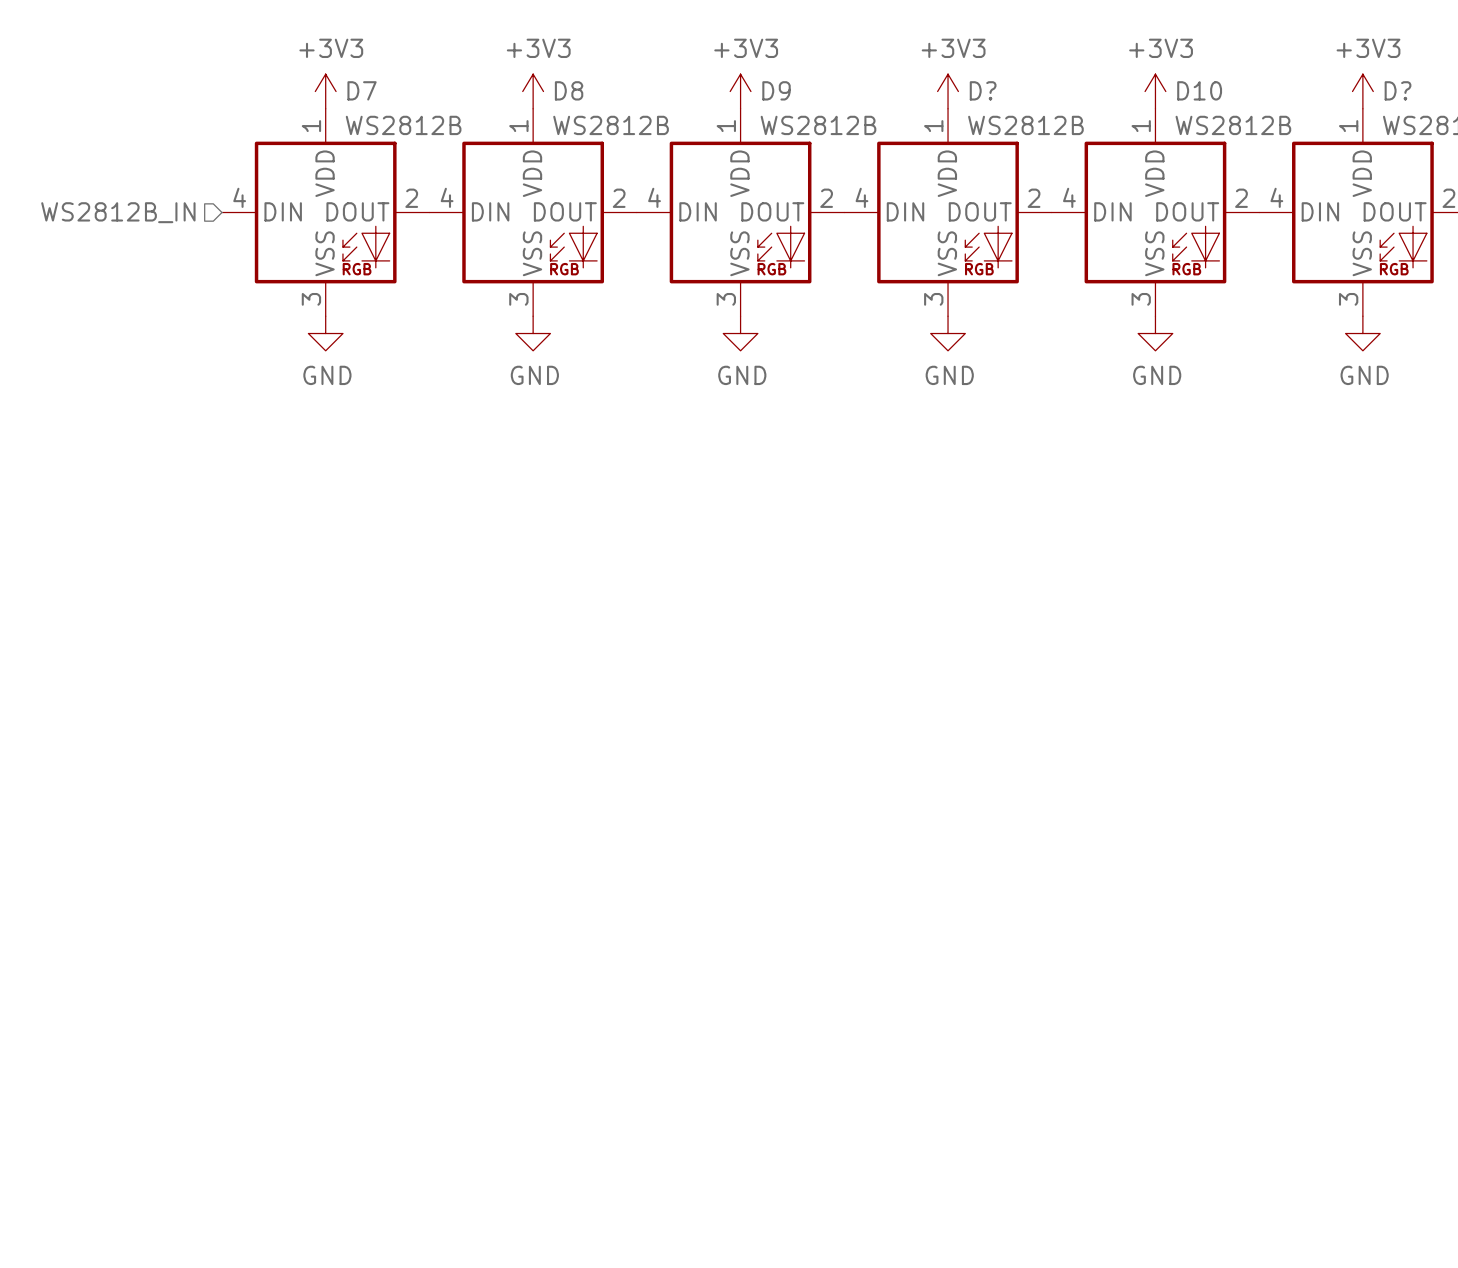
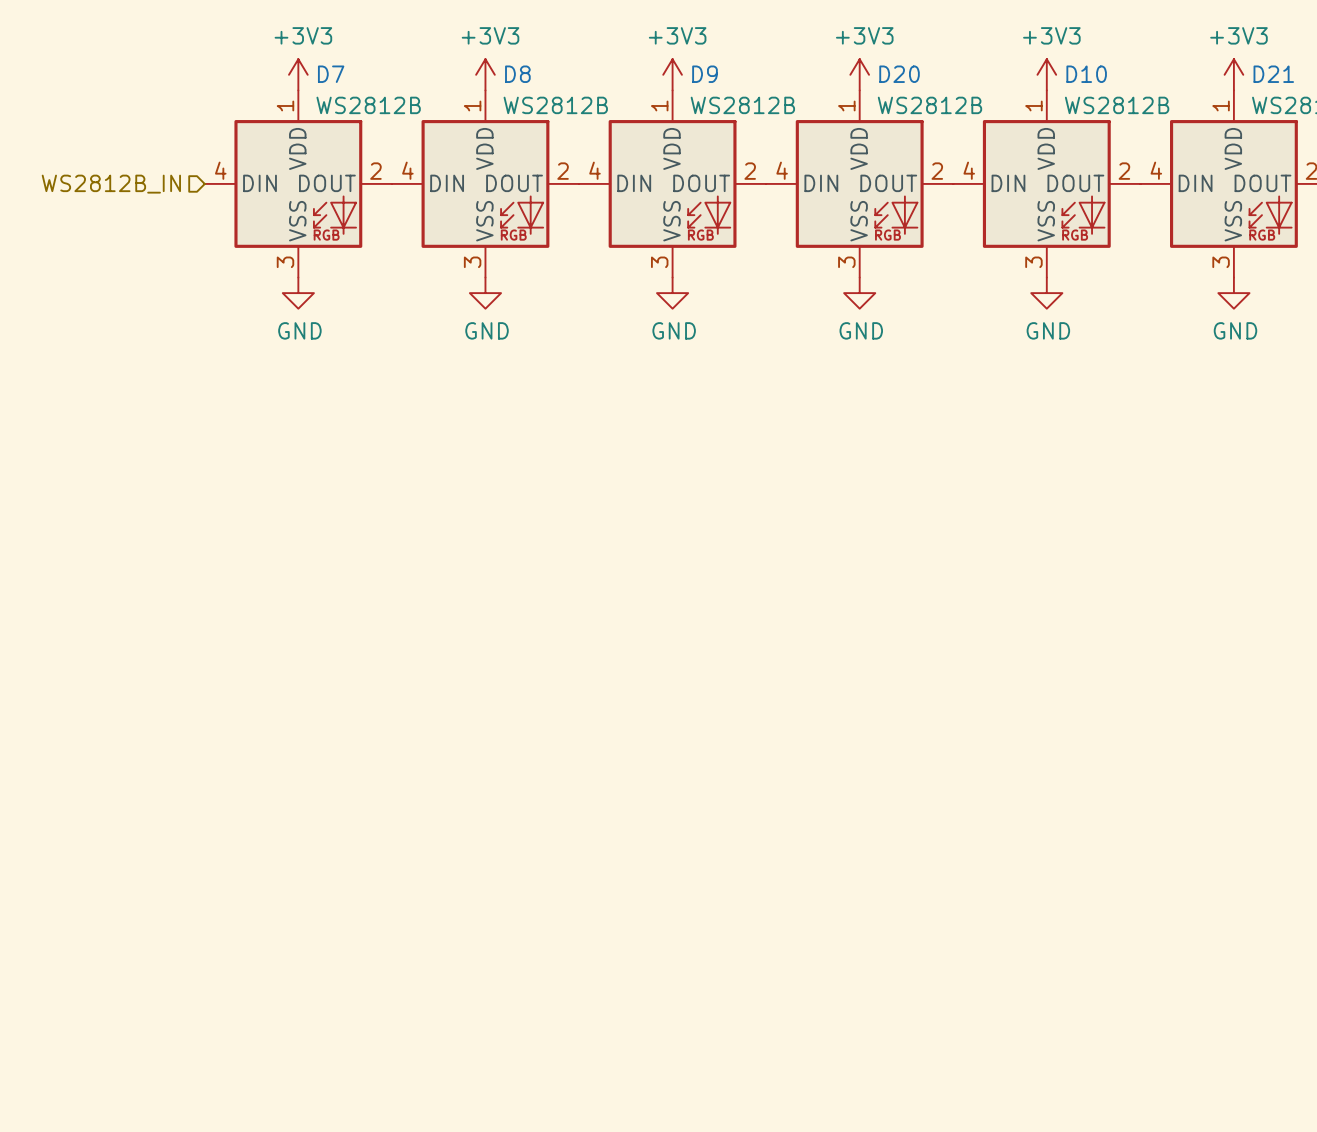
D? name: D? (983, 90) -> D20 (899, 74)
D? name: D? (1398, 90) -> D21 (1273, 74)

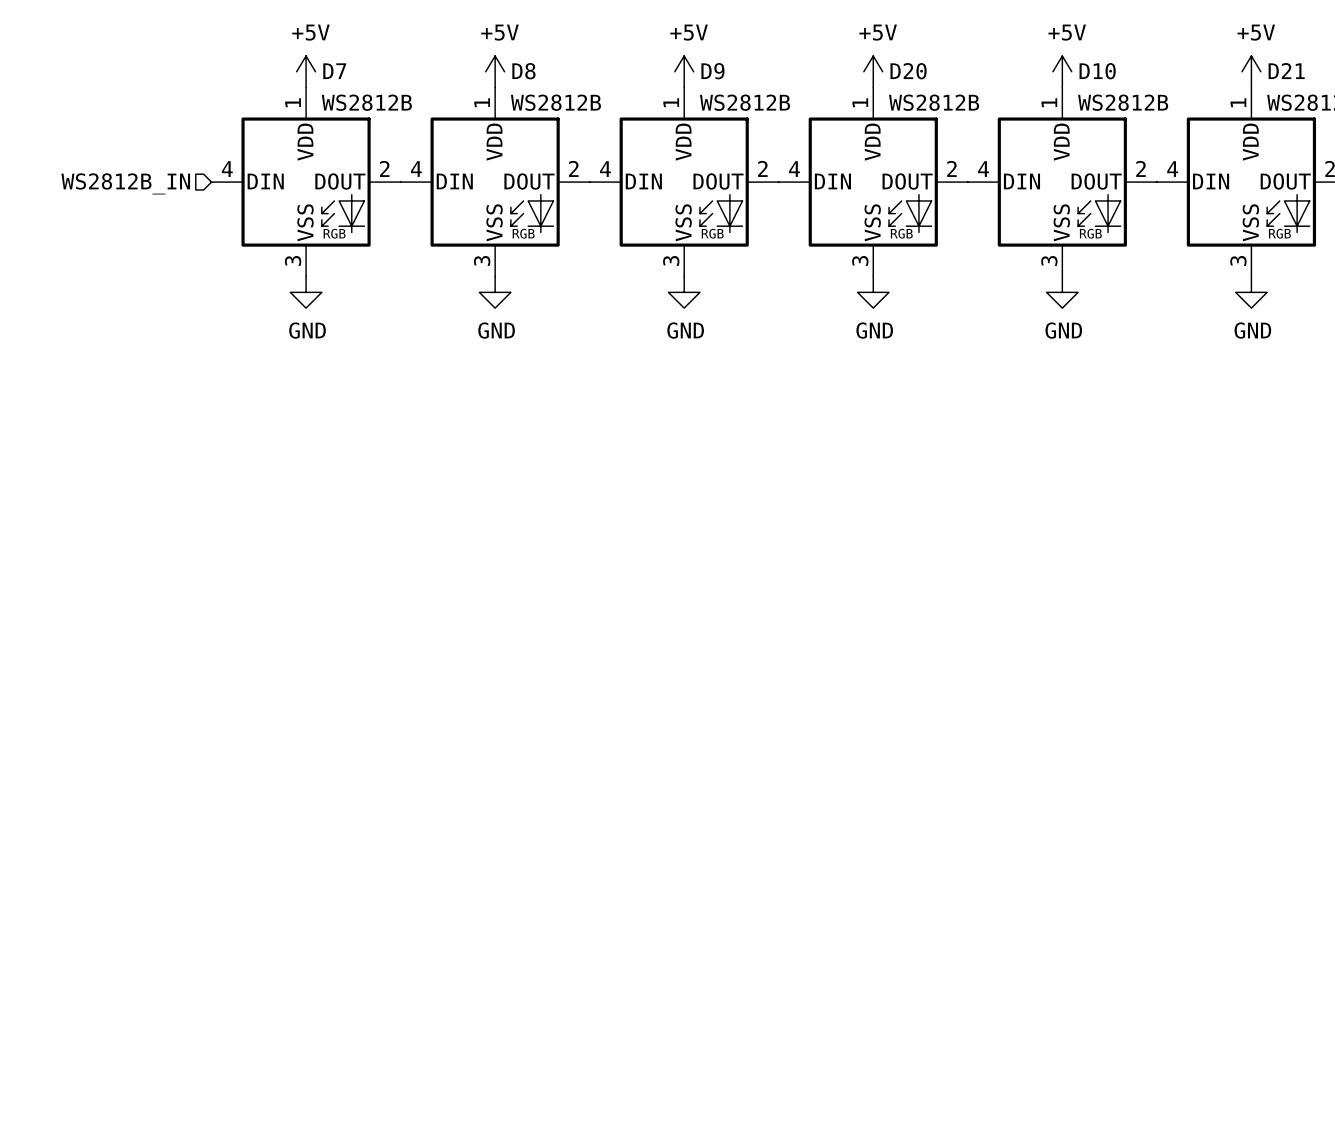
power symbol: +3V3 (298, 74) -> +5V (306, 71)
power symbol: +3V3 (485, 74) -> +5V (495, 71)
power symbol: +3V3 (672, 74) -> +5V (684, 71)
power symbol: +3V3 (859, 74) -> +5V (873, 71)
power symbol: +3V3 (1046, 74) -> +5V (1062, 71)
power symbol: +3V3 (1233, 74) -> +5V (1251, 71)

